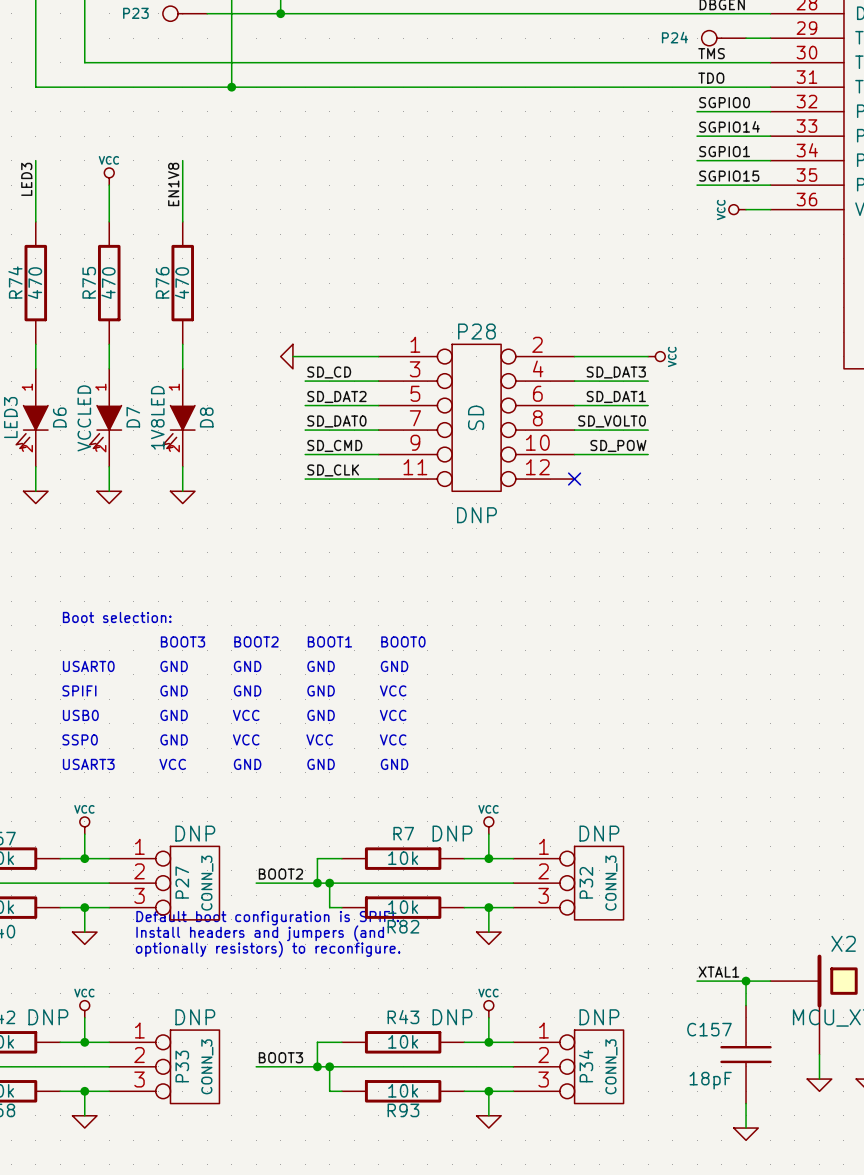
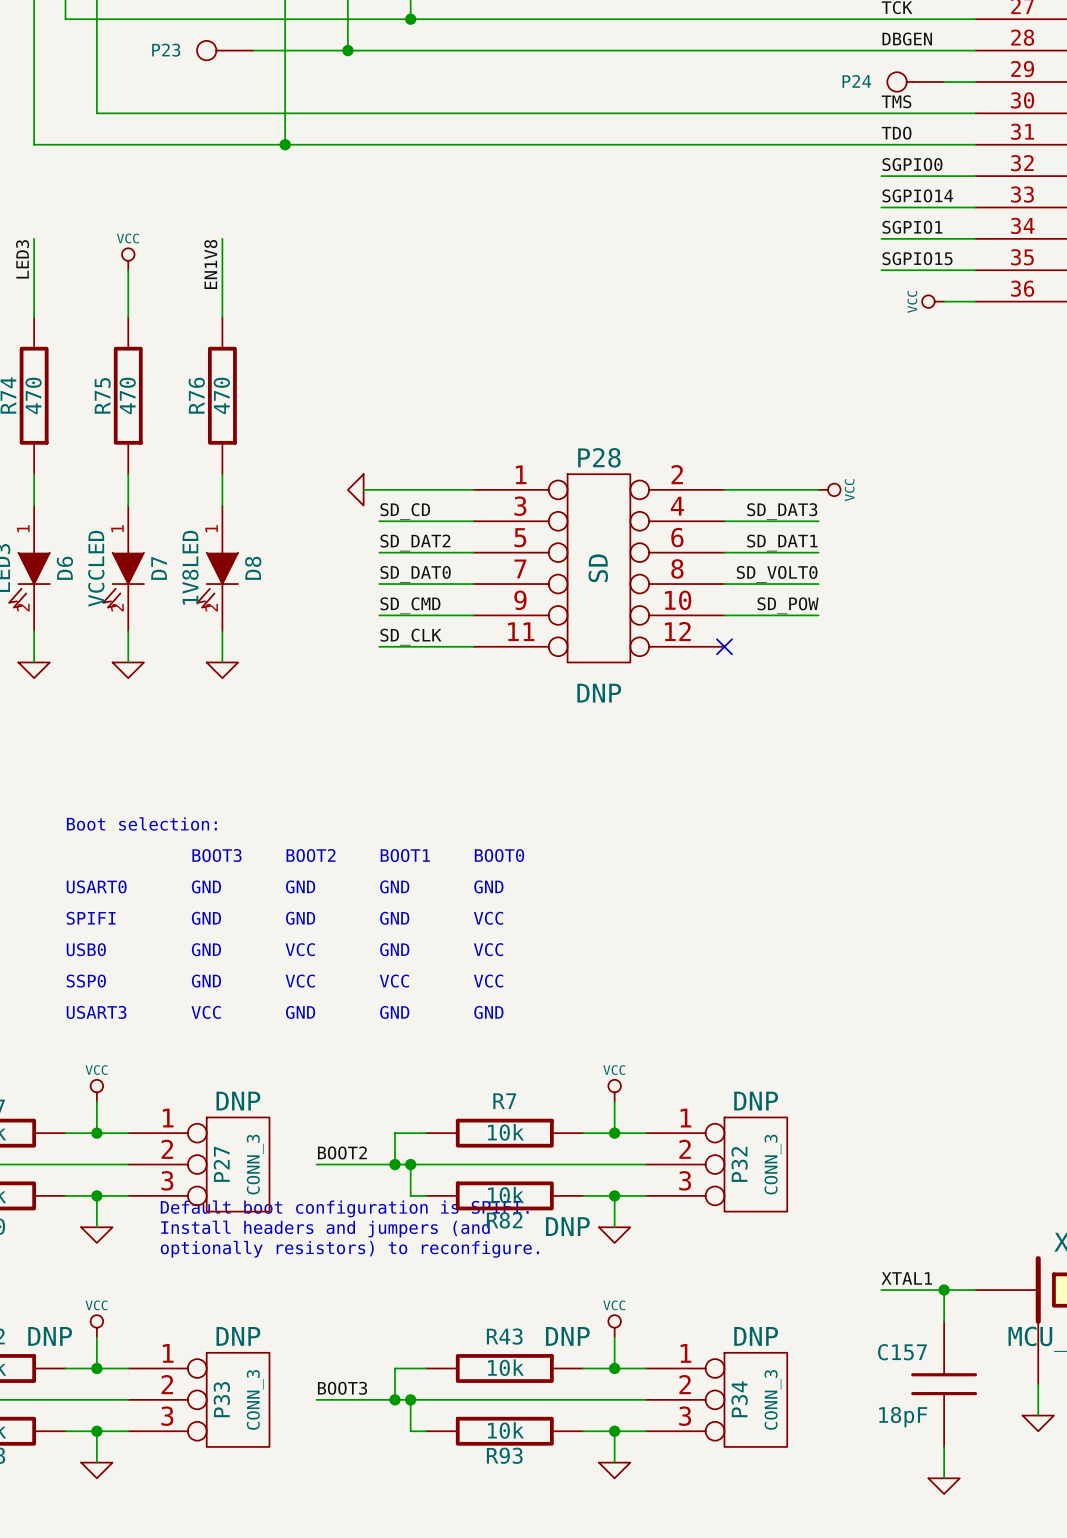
R7 text: DNP (452, 833) -> none
R82 text: none -> DNP (567, 1226)

